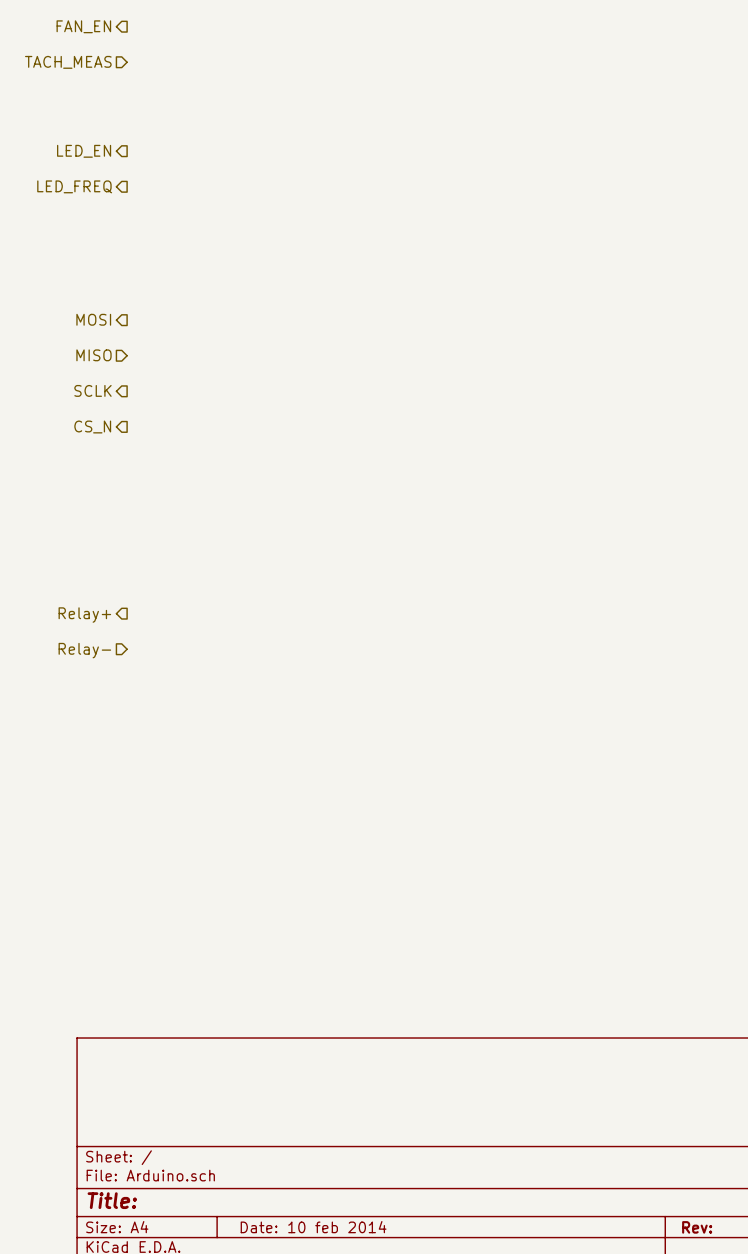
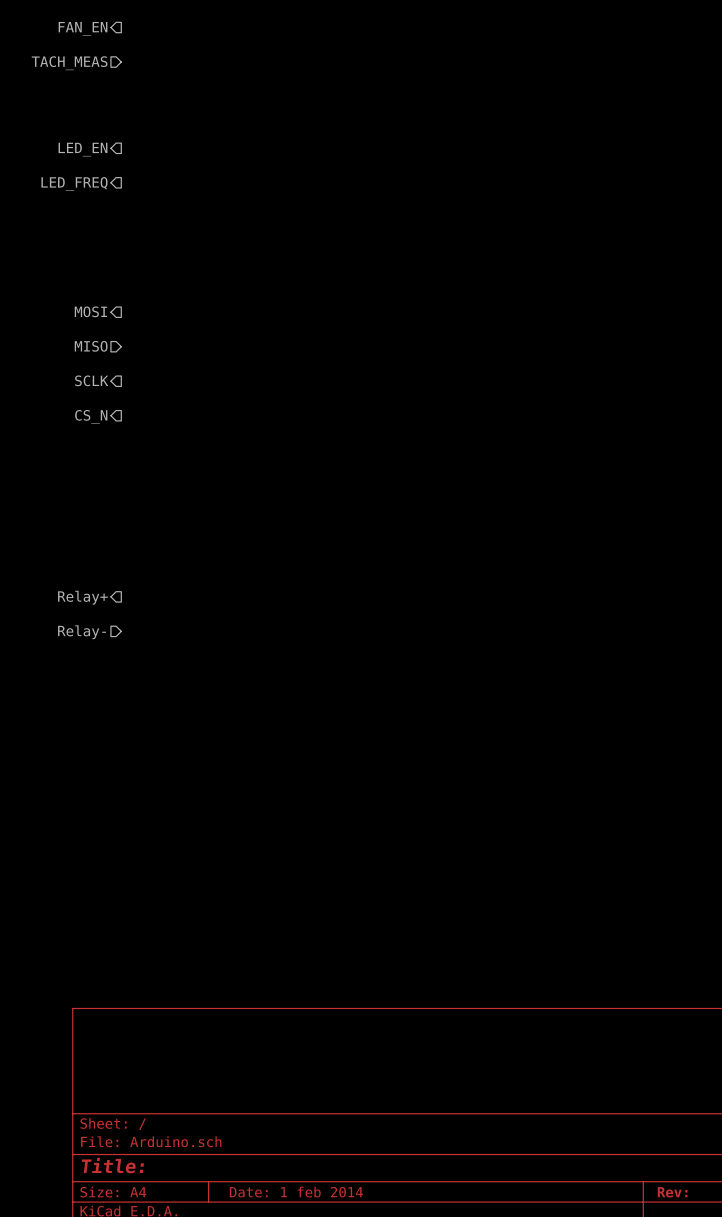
title block: Date: 10 feb 2014 (313, 1227) -> Date: 1 feb 2014 (296, 1192)

